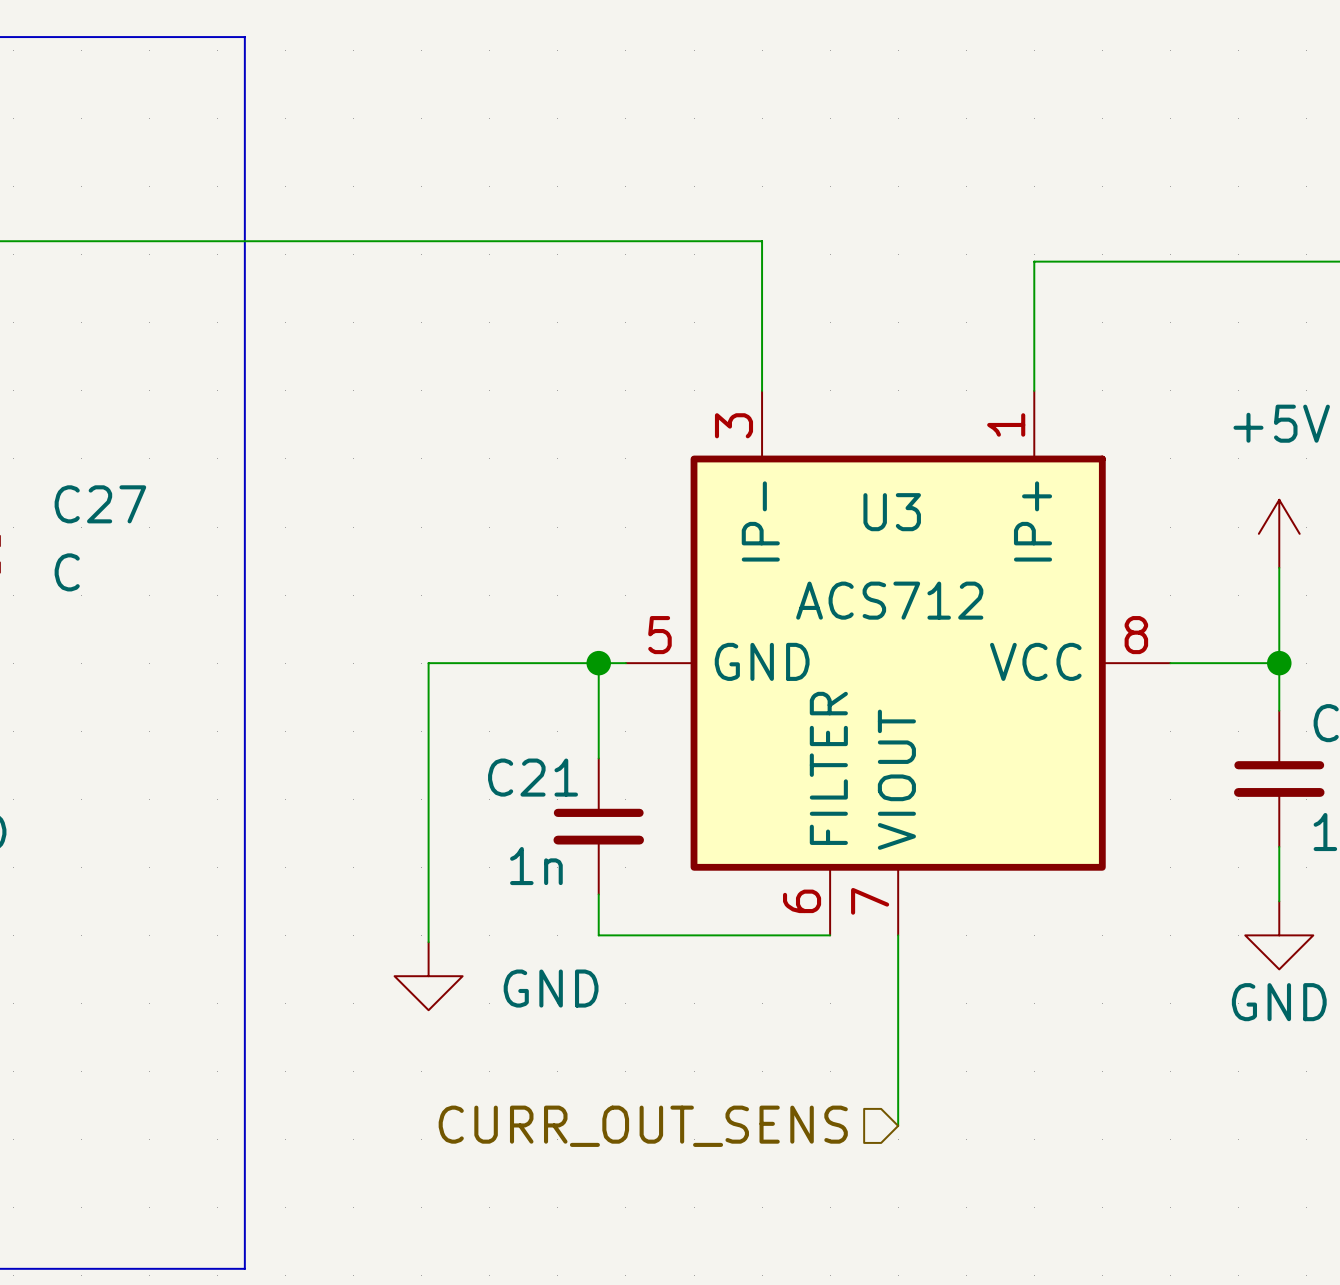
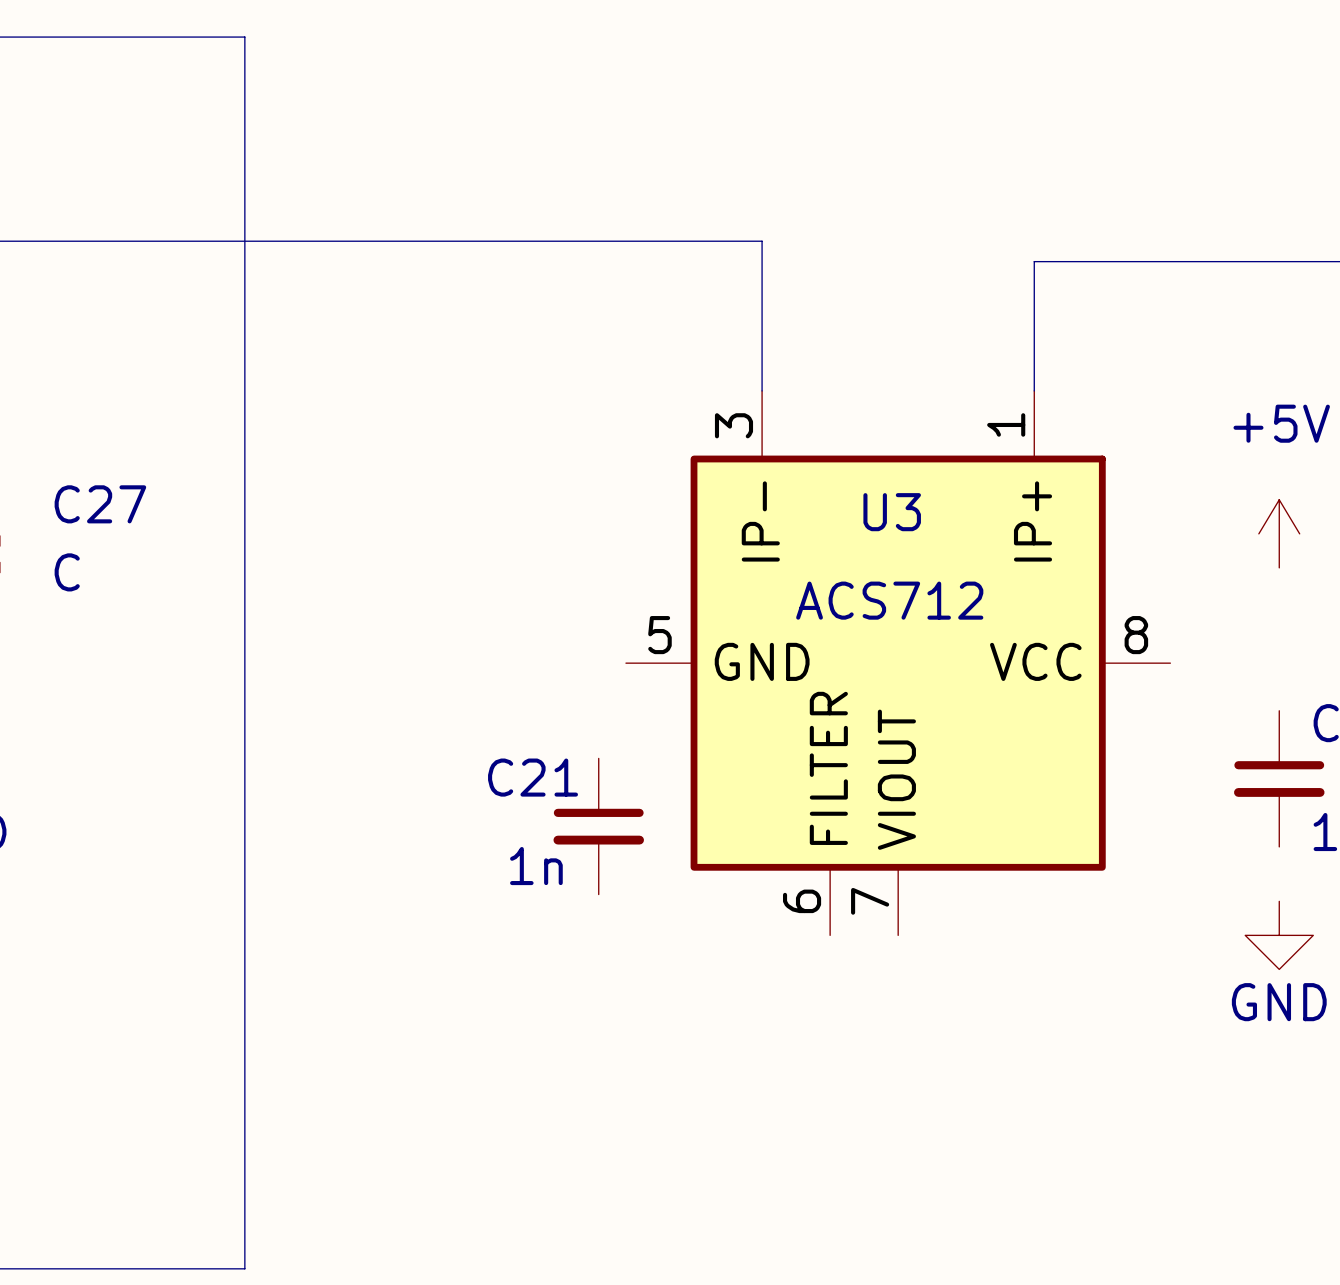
wire: (1279, 567) (1279, 710) -> none
wire: (598, 663) (598, 758) -> none
junction: (598, 663) -> none
wire: (625, 663) (428, 663) (428, 942) -> none
wire: (1170, 663) (1279, 663) -> none
junction: (1279, 663) -> none
wire: (1279, 846) (1279, 901) -> none
wire: (598, 894) (598, 935) (830, 935) -> none
wire: (898, 935) (898, 1125) -> none
power symbol: GND (428, 976) -> none
hierarchical label: CURR_OUT_SENS (643, 1126) -> none

